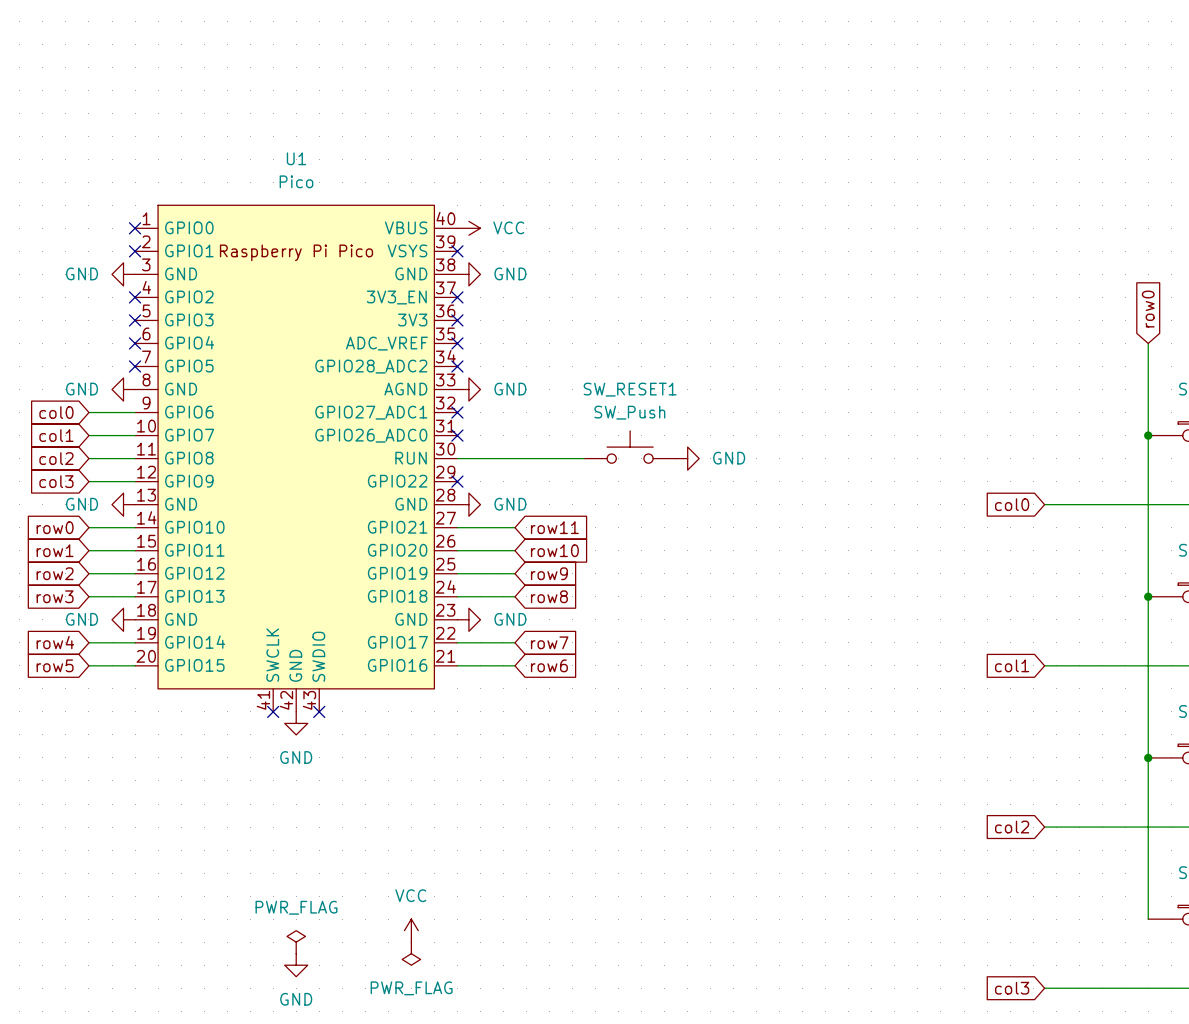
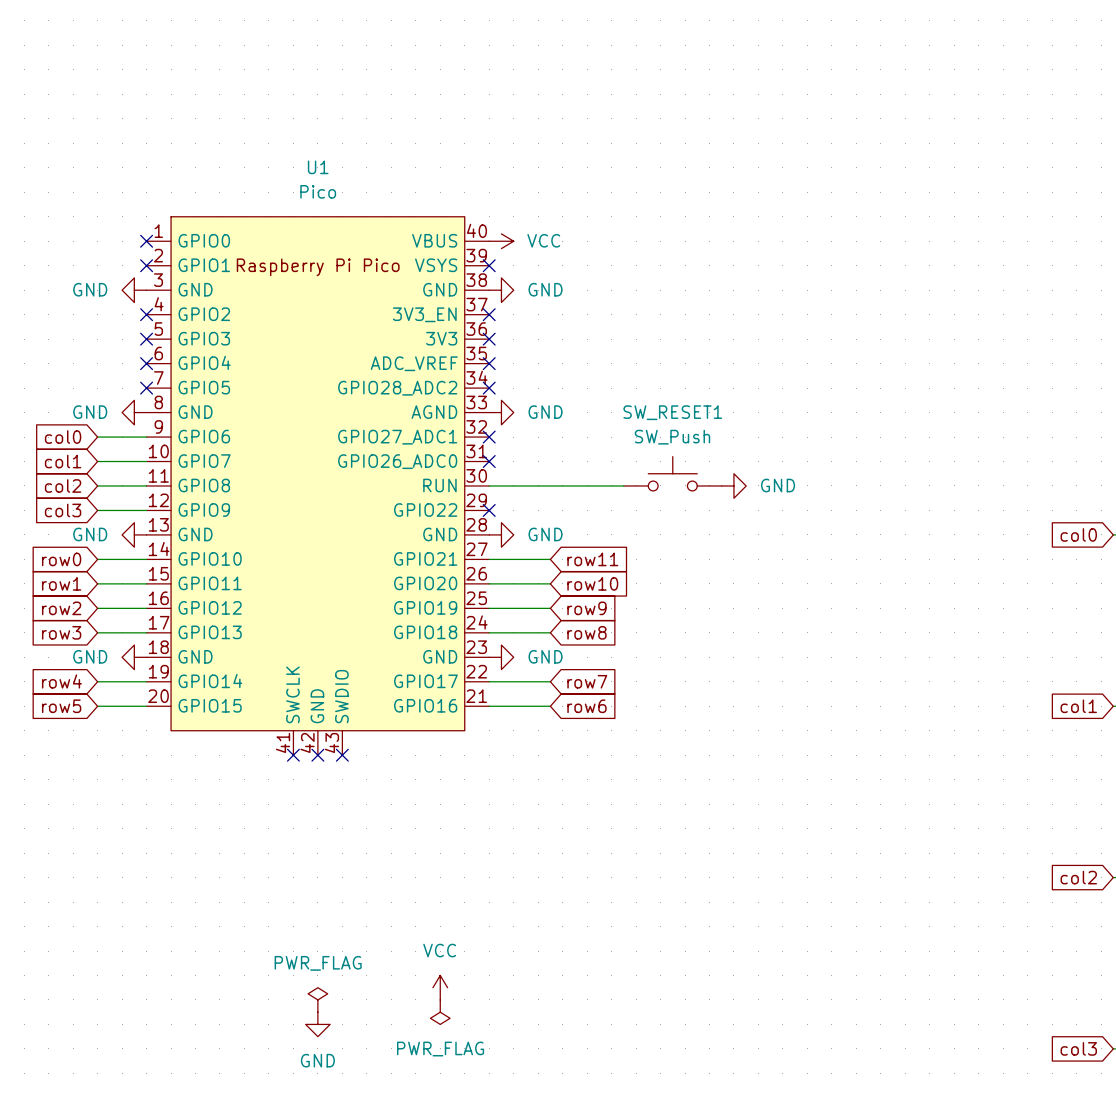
no-connect mark: none -> (317, 755)
power symbol: GND (296, 723) -> none

